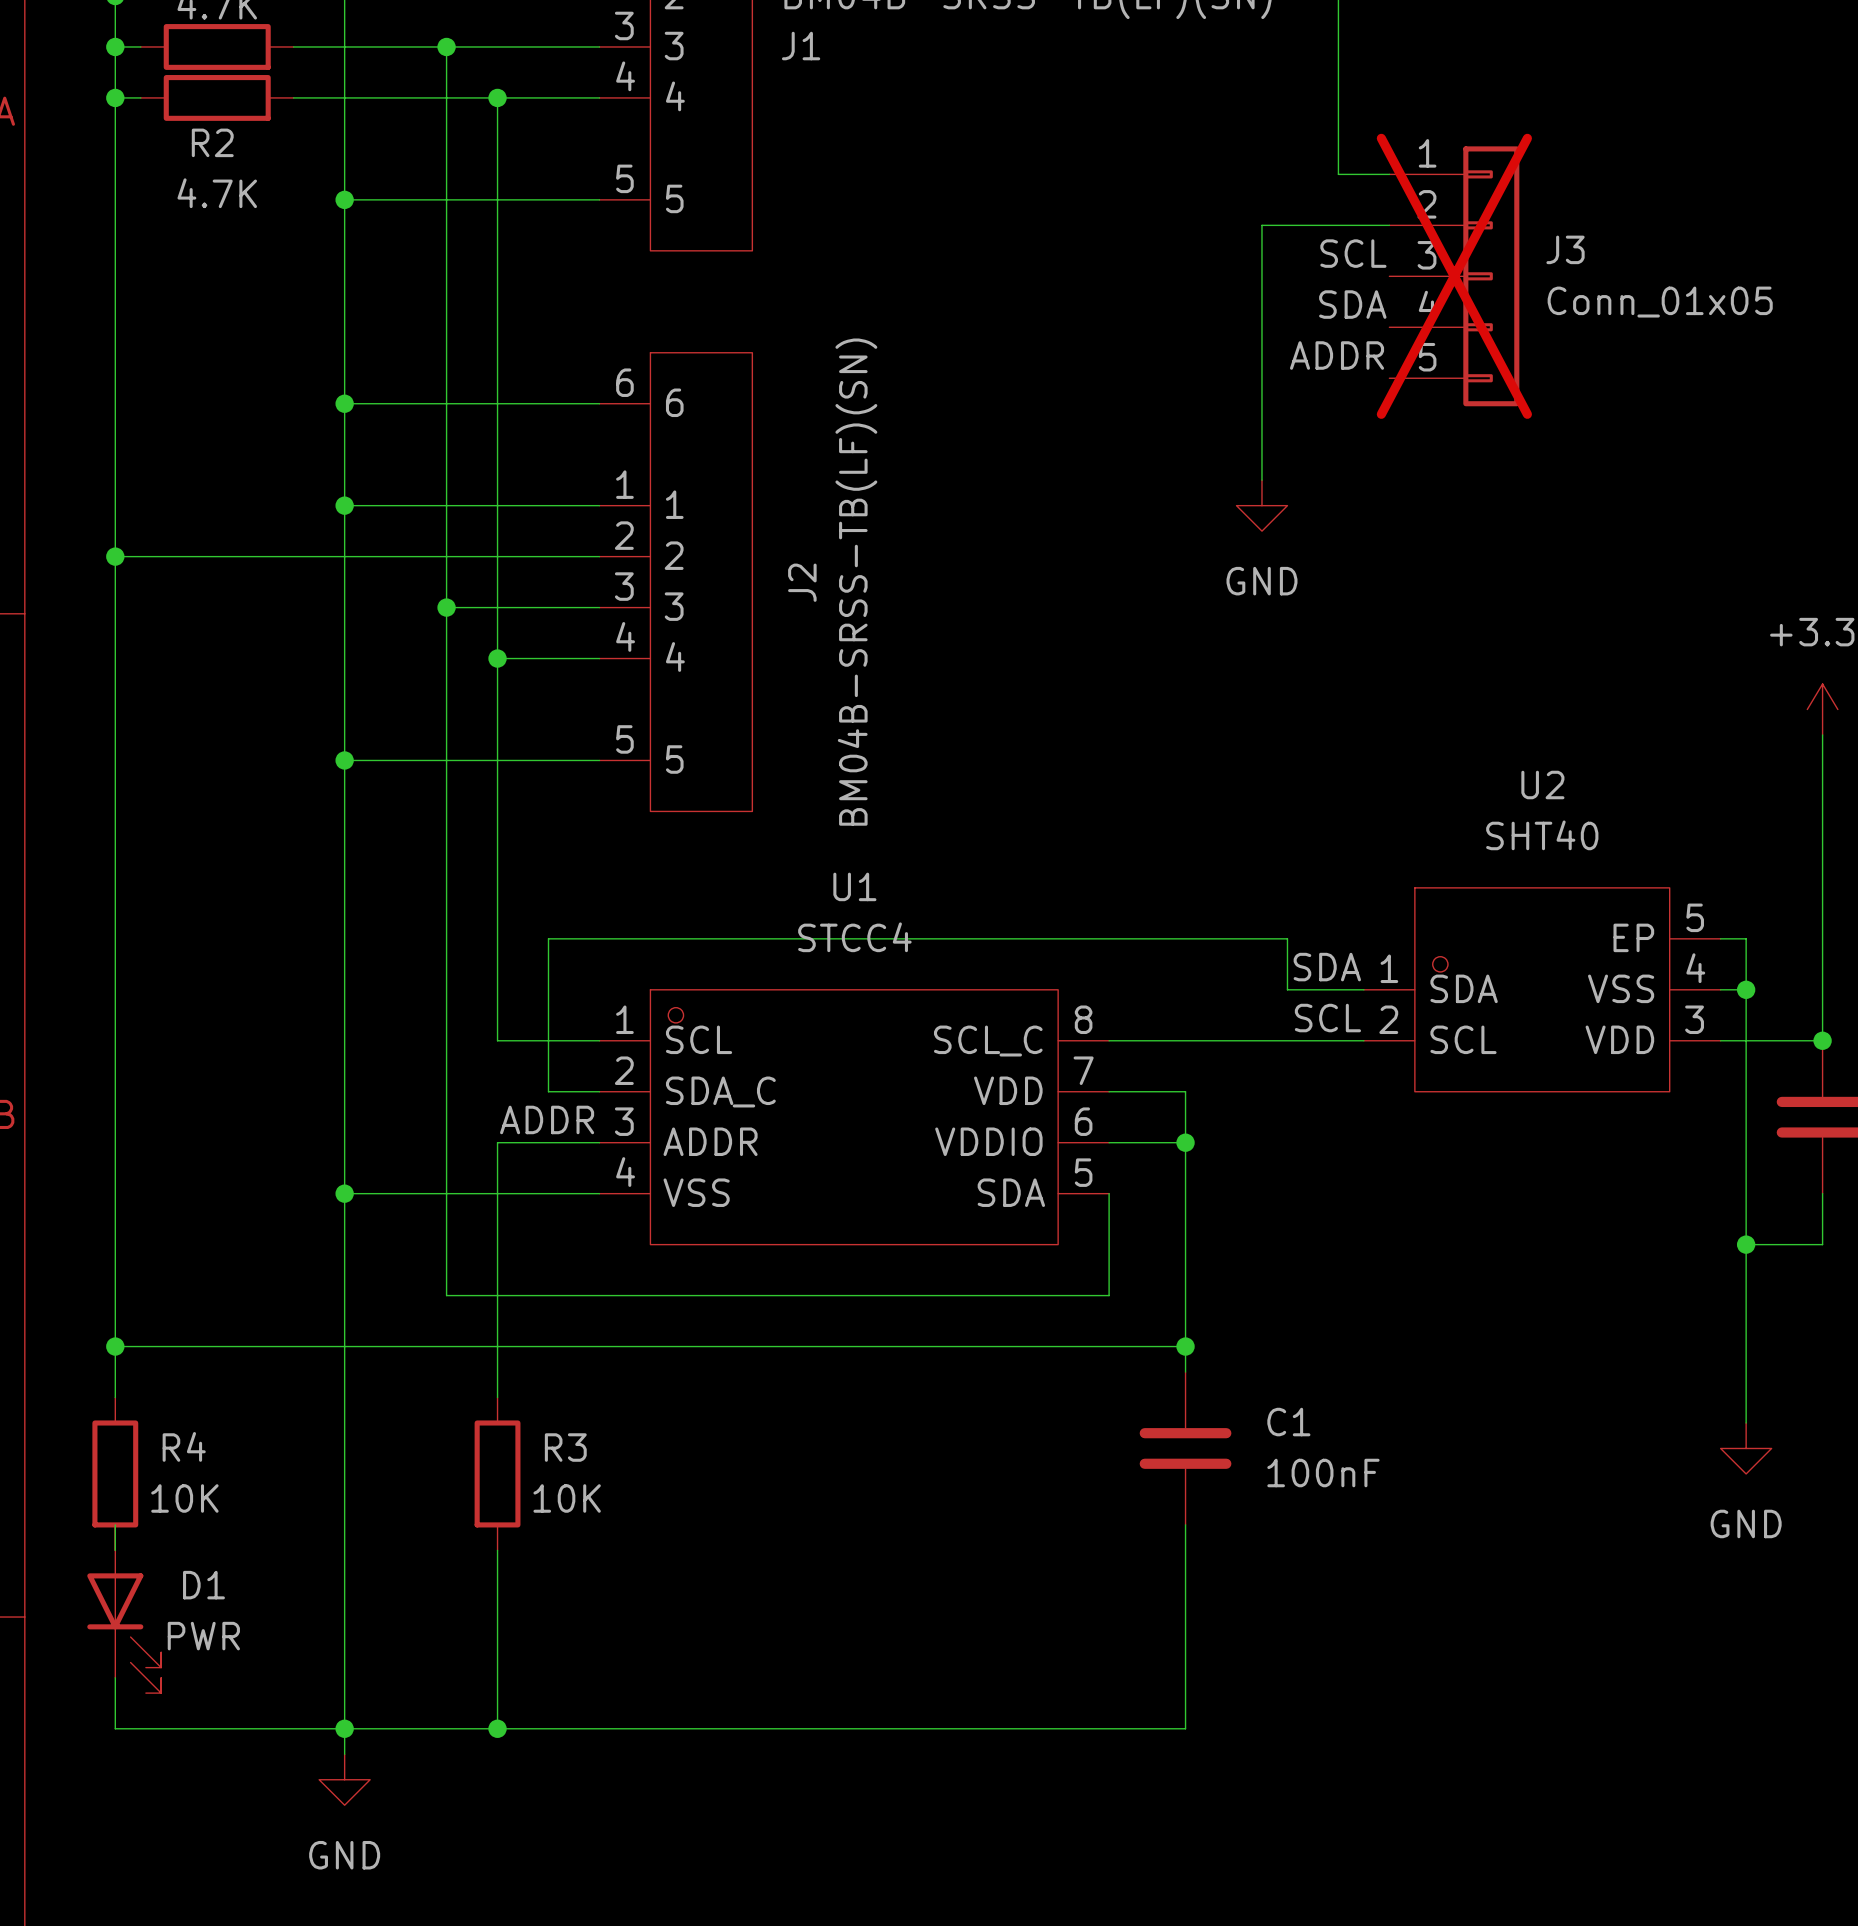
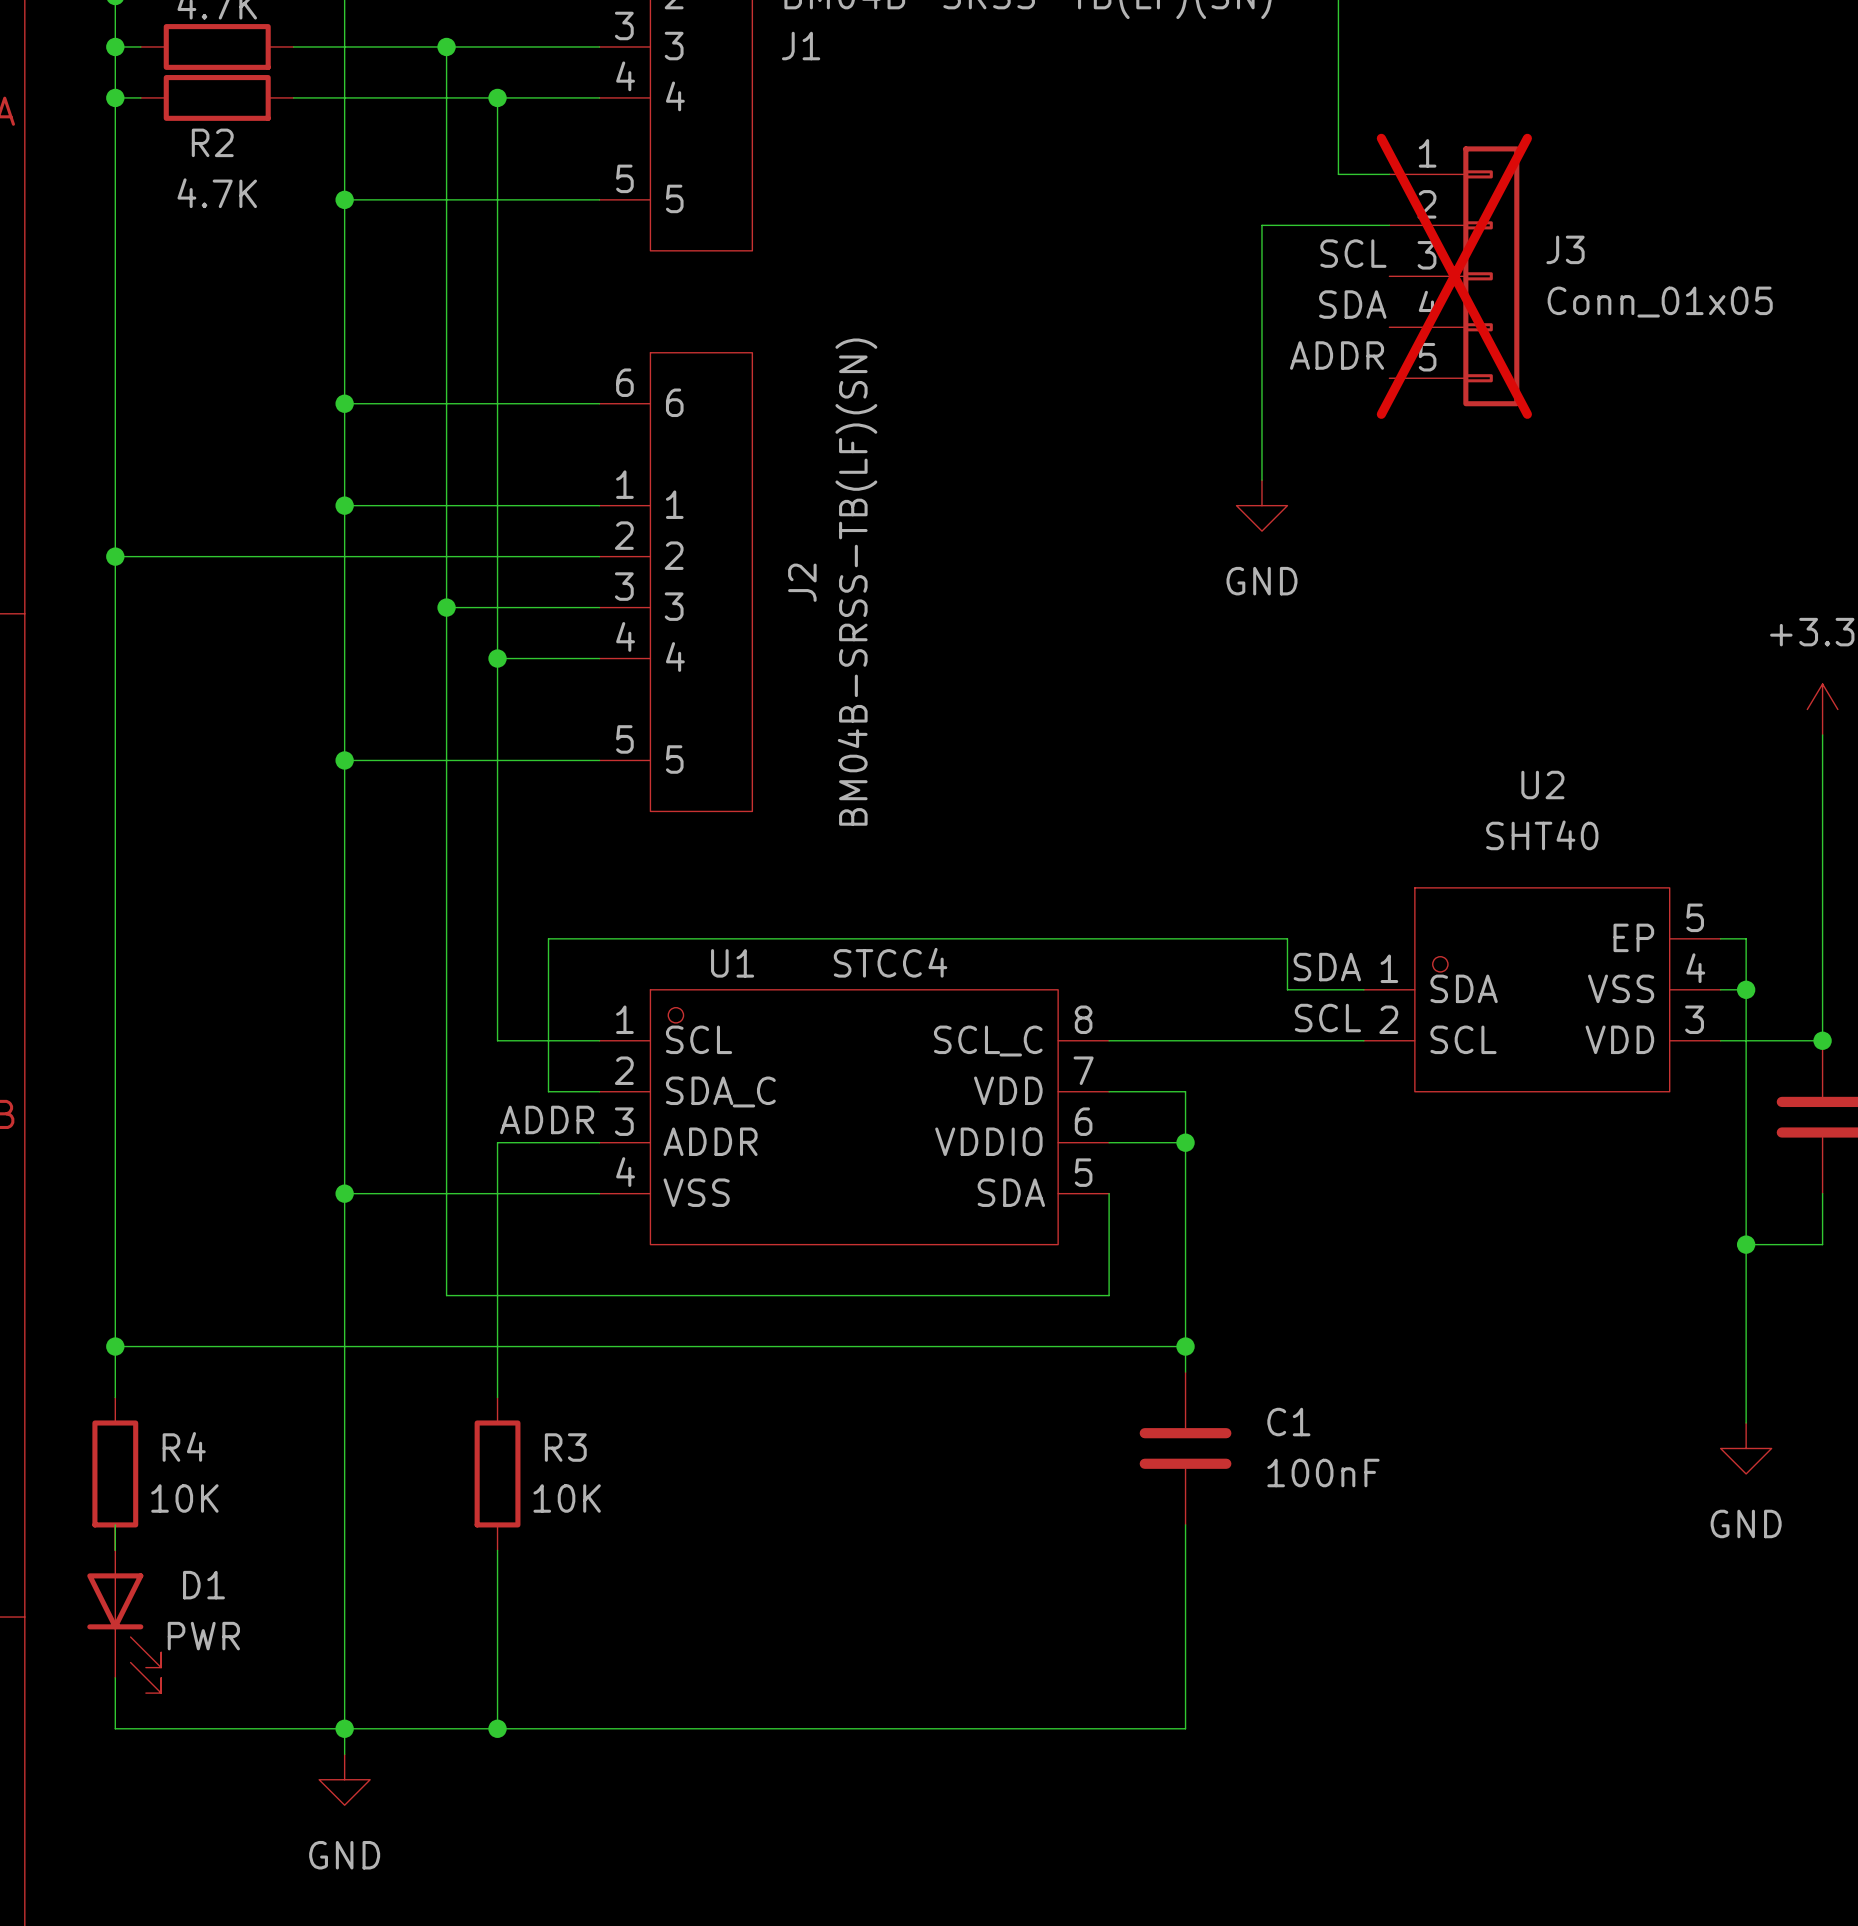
U1 name position: U1 (854, 886) -> U1 (732, 963)
U1 value position: STCC4 (854, 937) -> STCC4 (890, 962)

